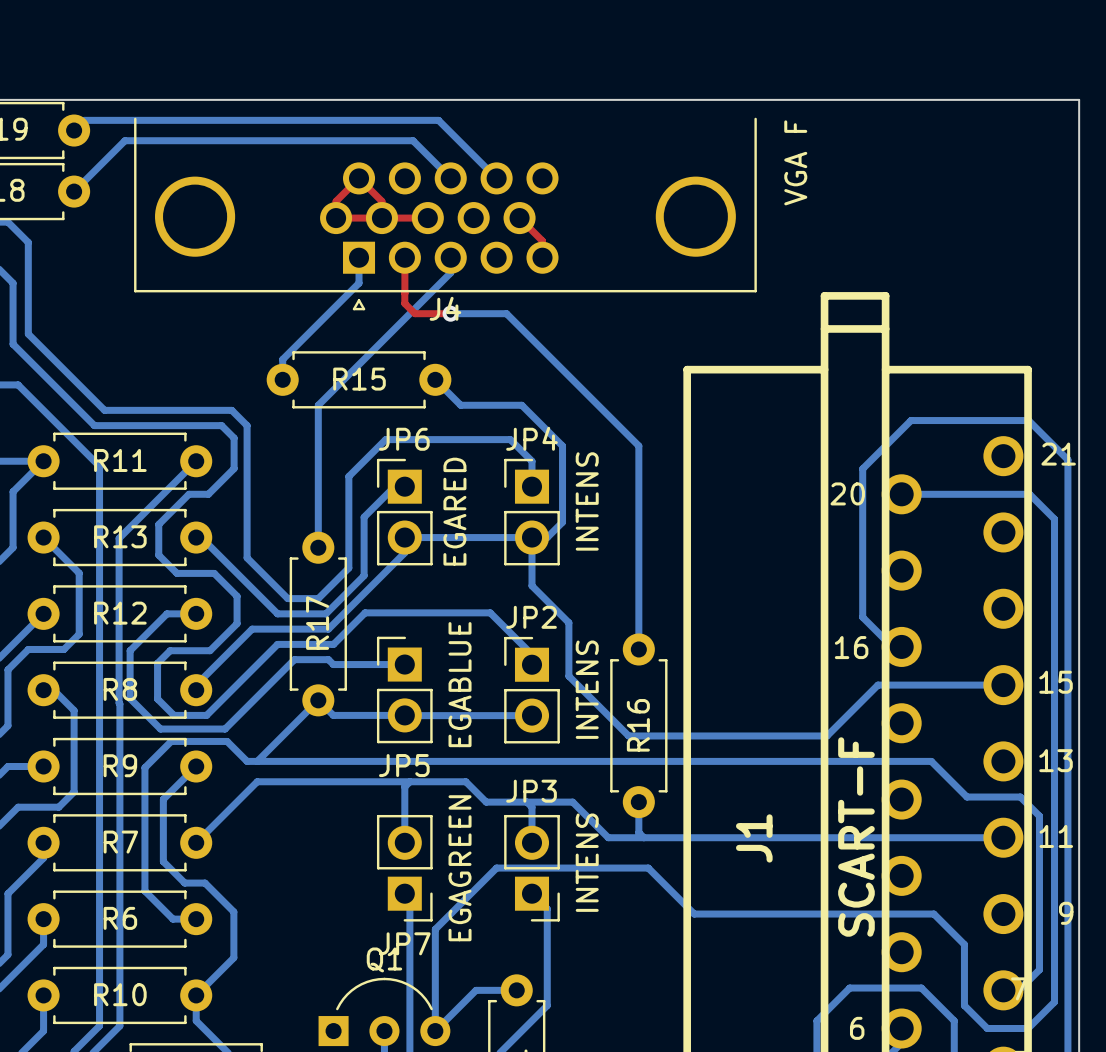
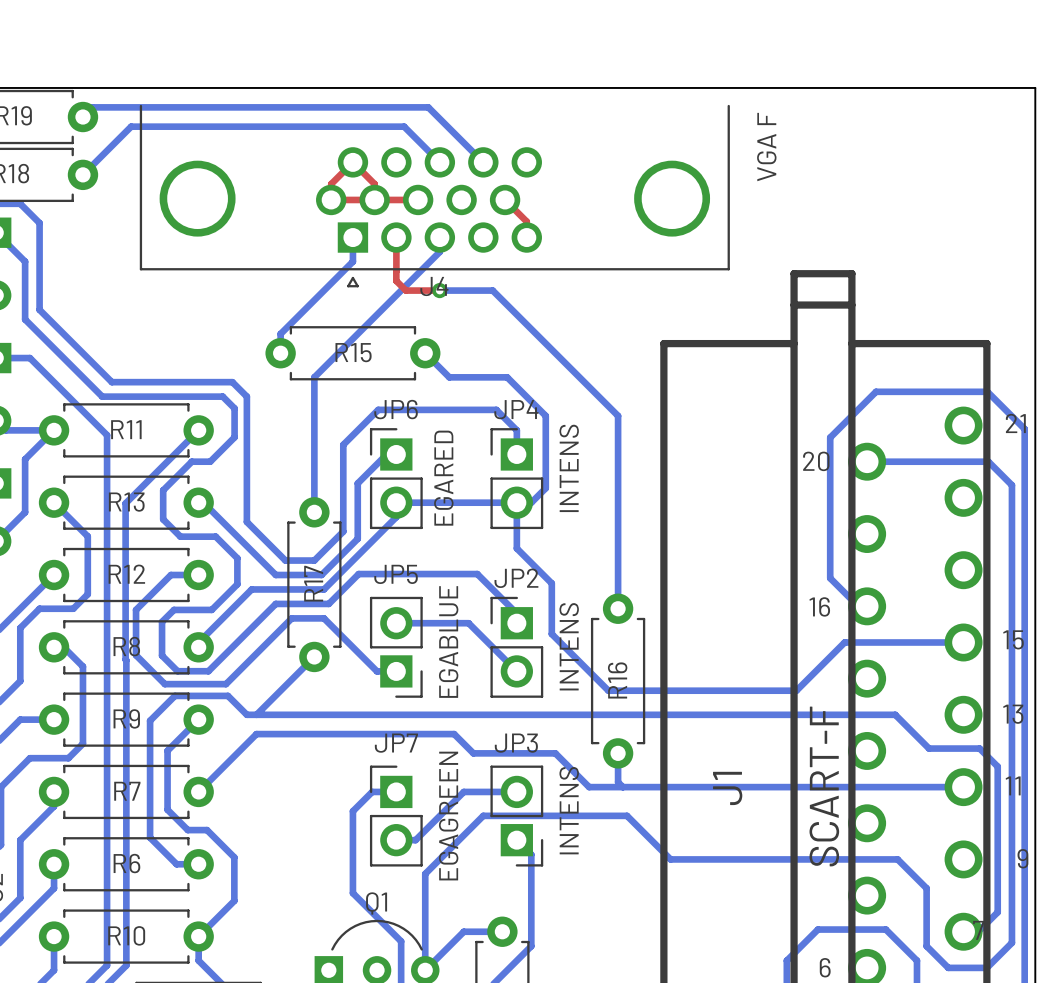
bottom track: (333, 664) (404, 664) -> none
JP5 rotation: 0° (404, 689) -> 180° (396, 647)
bottom track: (318, 700) (333, 715) (404, 715) -> (328, 623) (377, 671) (396, 671)
bottom track: (405, 715) (532, 715) -> (396, 623) (468, 623) (516, 671)
bottom track: (409, 781) (404, 786) (404, 842) -> none
bottom track: (526, 802) (532, 807) (532, 842) -> (396, 840) (415, 840) (463, 791) (516, 791)
JP7 rotation: 0° (404, 868) -> 180° (396, 816)
bottom track: (404, 893) (409, 898) (409, 1000) -> (396, 791) (372, 791) (352, 811) (352, 893) (401, 941)

